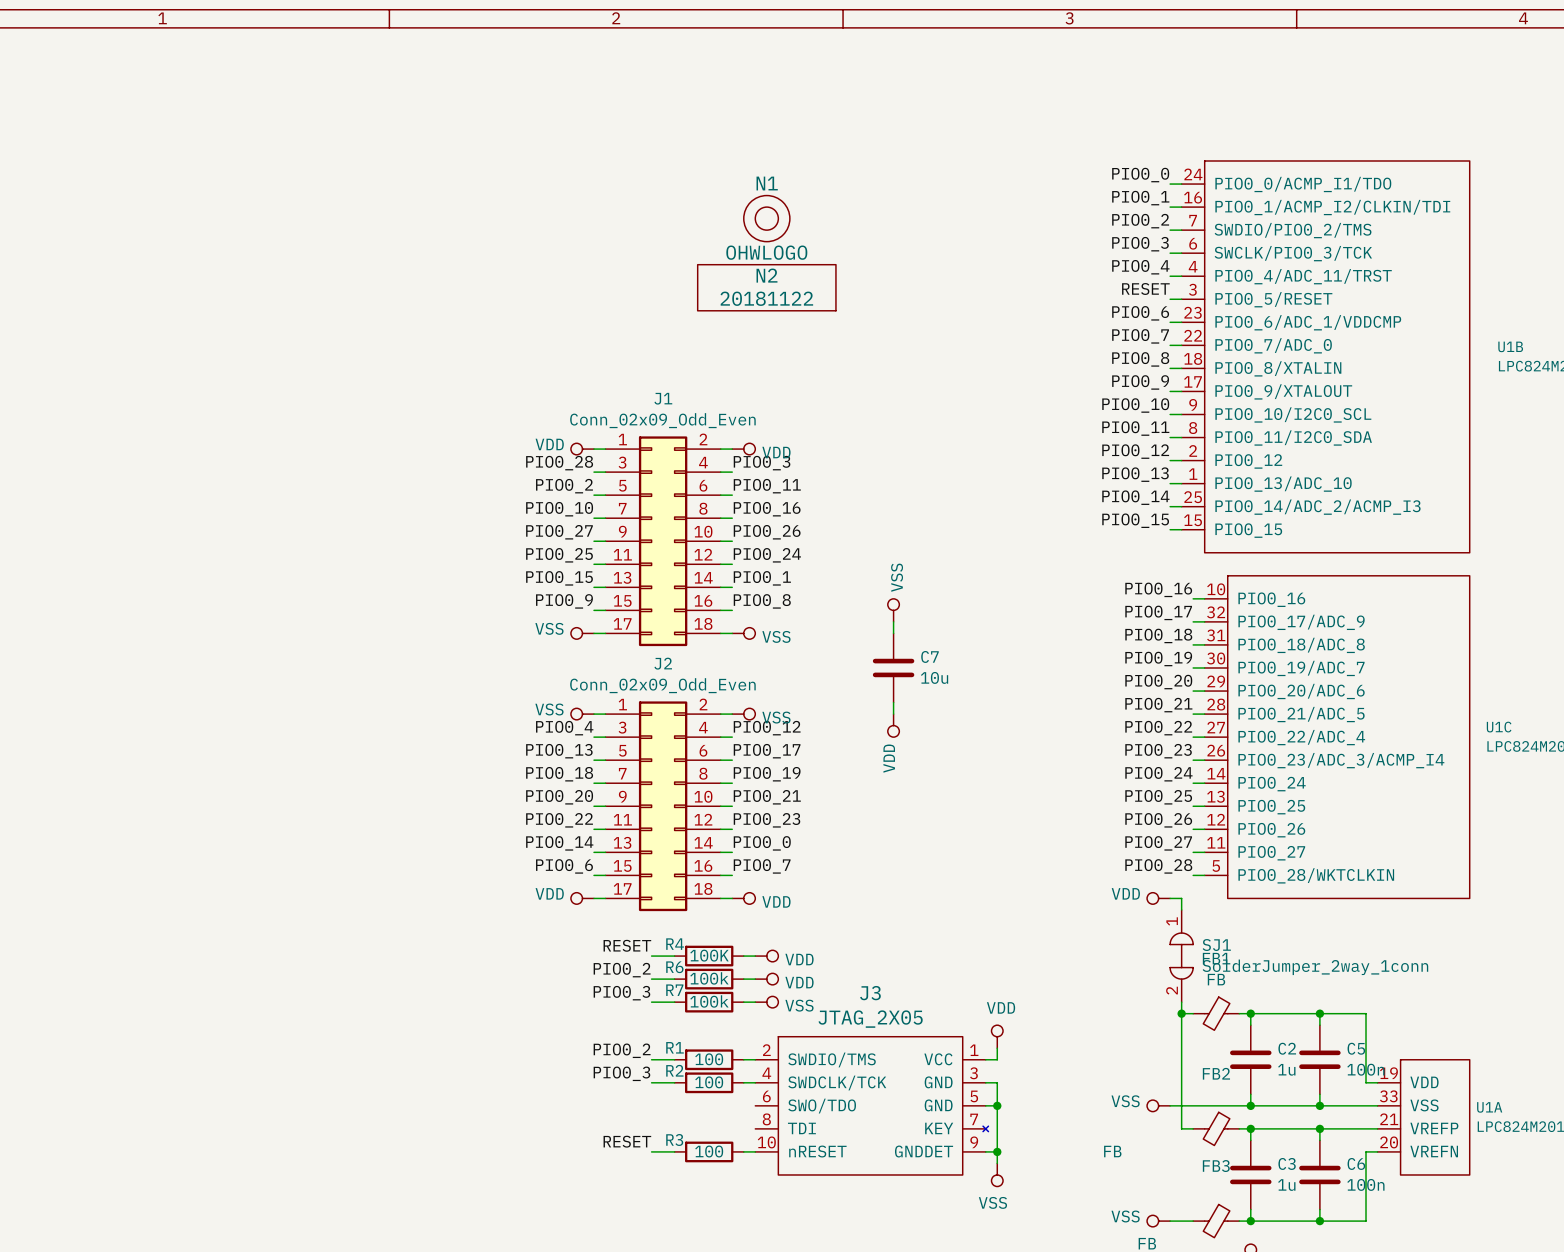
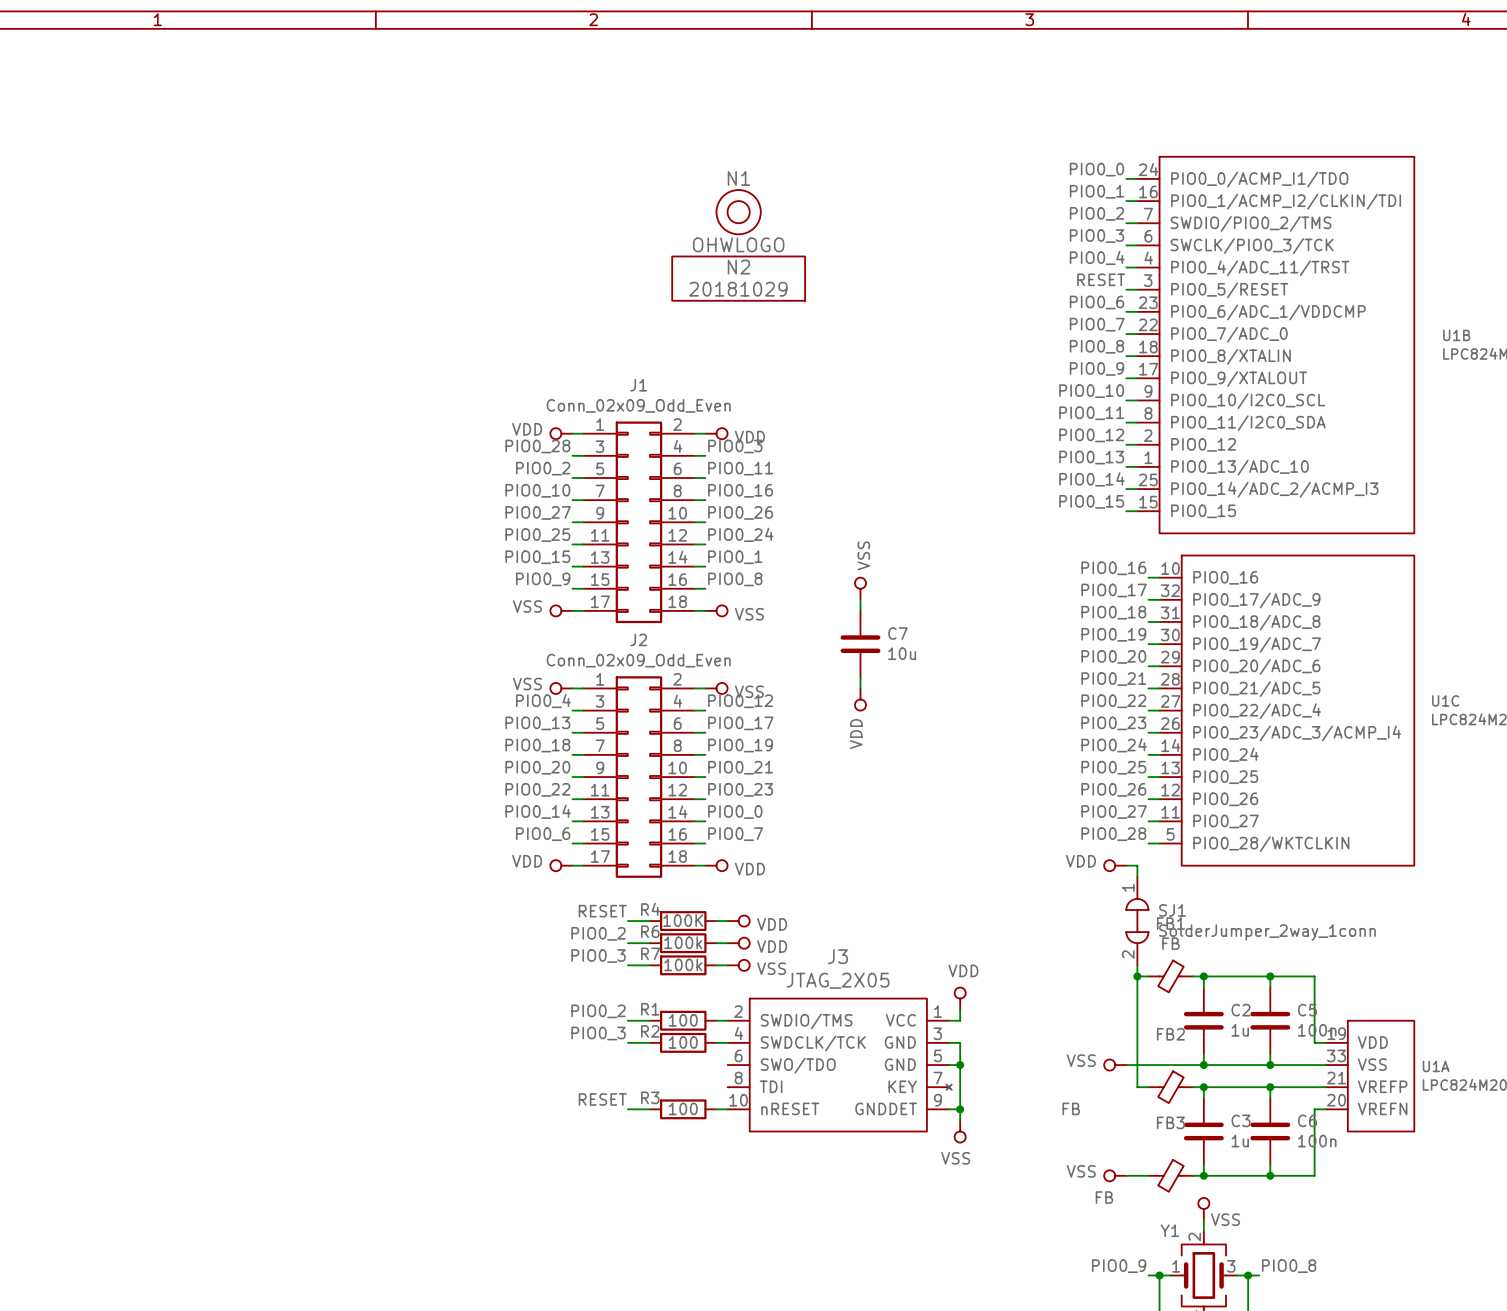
N2 value: 20181122 (766, 298) -> 20181029 (738, 289)

